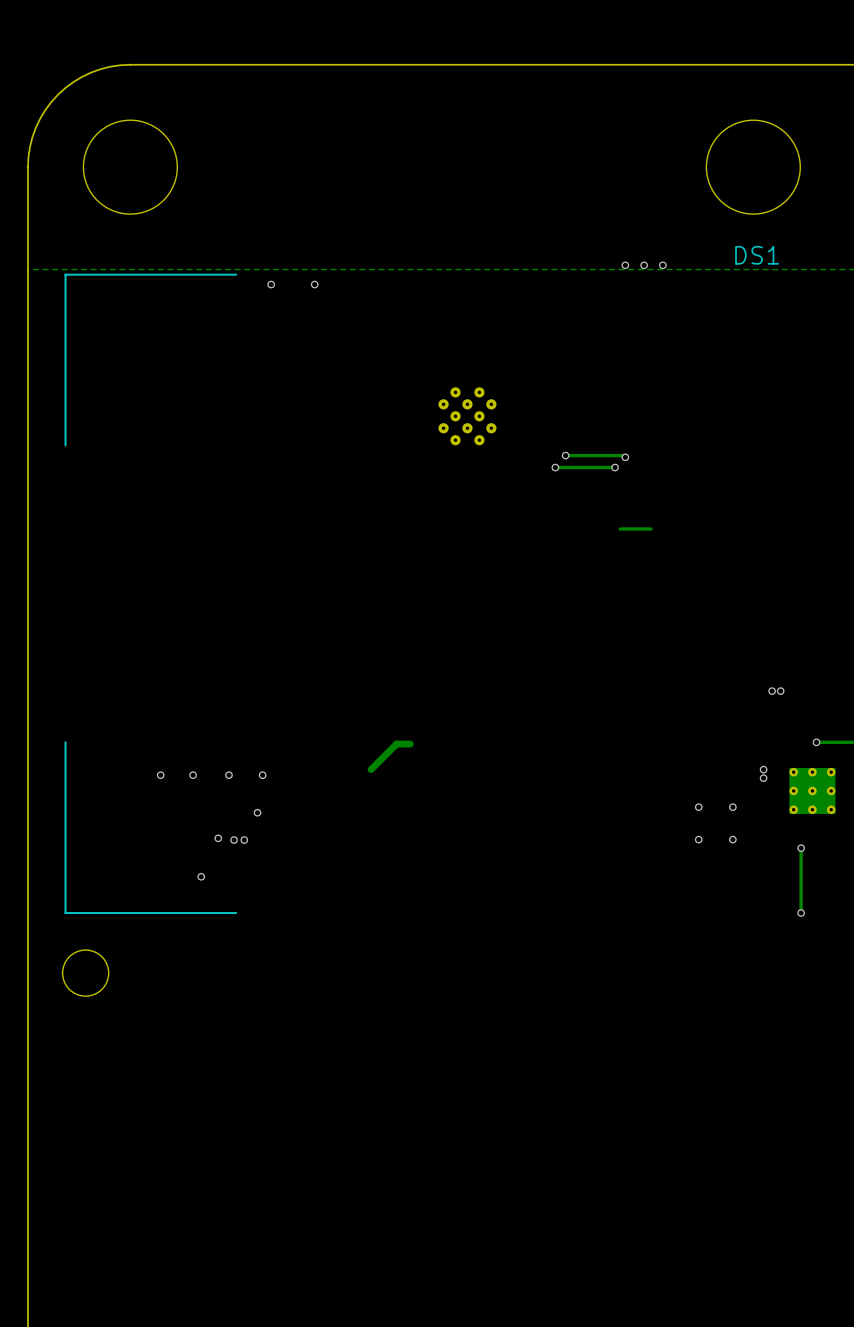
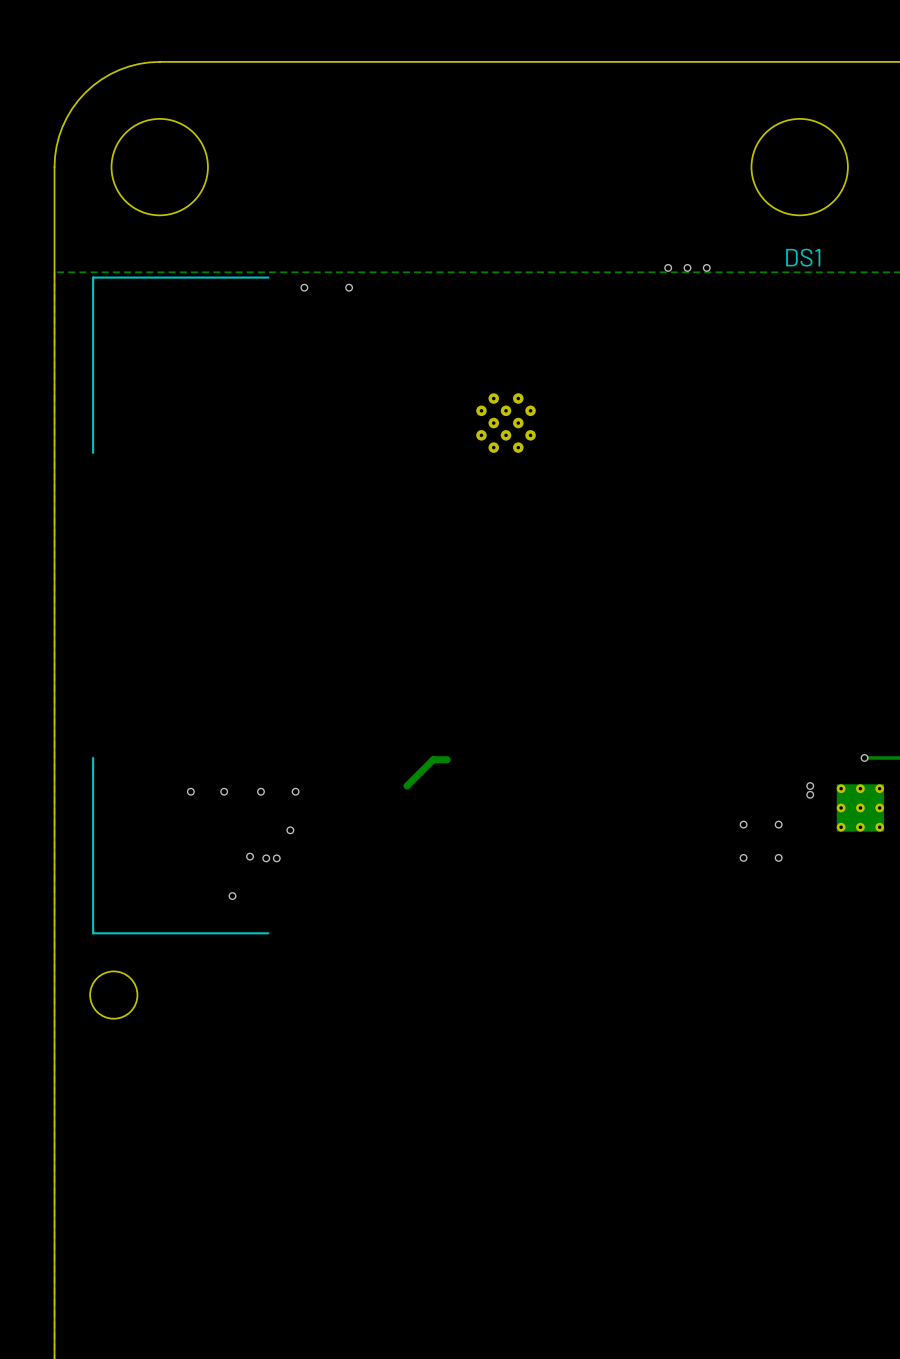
track: (565, 455) (623, 455) (625, 457) -> none
via: (565, 455) -> none
via: (625, 457) -> none
via: (555, 467) -> none
track: (615, 467) (555, 467) (553, 469) -> none
via: (615, 467) -> none
track: (650, 528) (620, 528) -> none
via: (772, 691) -> none
via: (780, 691) -> none
track: (801, 848) (801, 913) -> none
via: (801, 848) -> none
via: (801, 913) -> none

